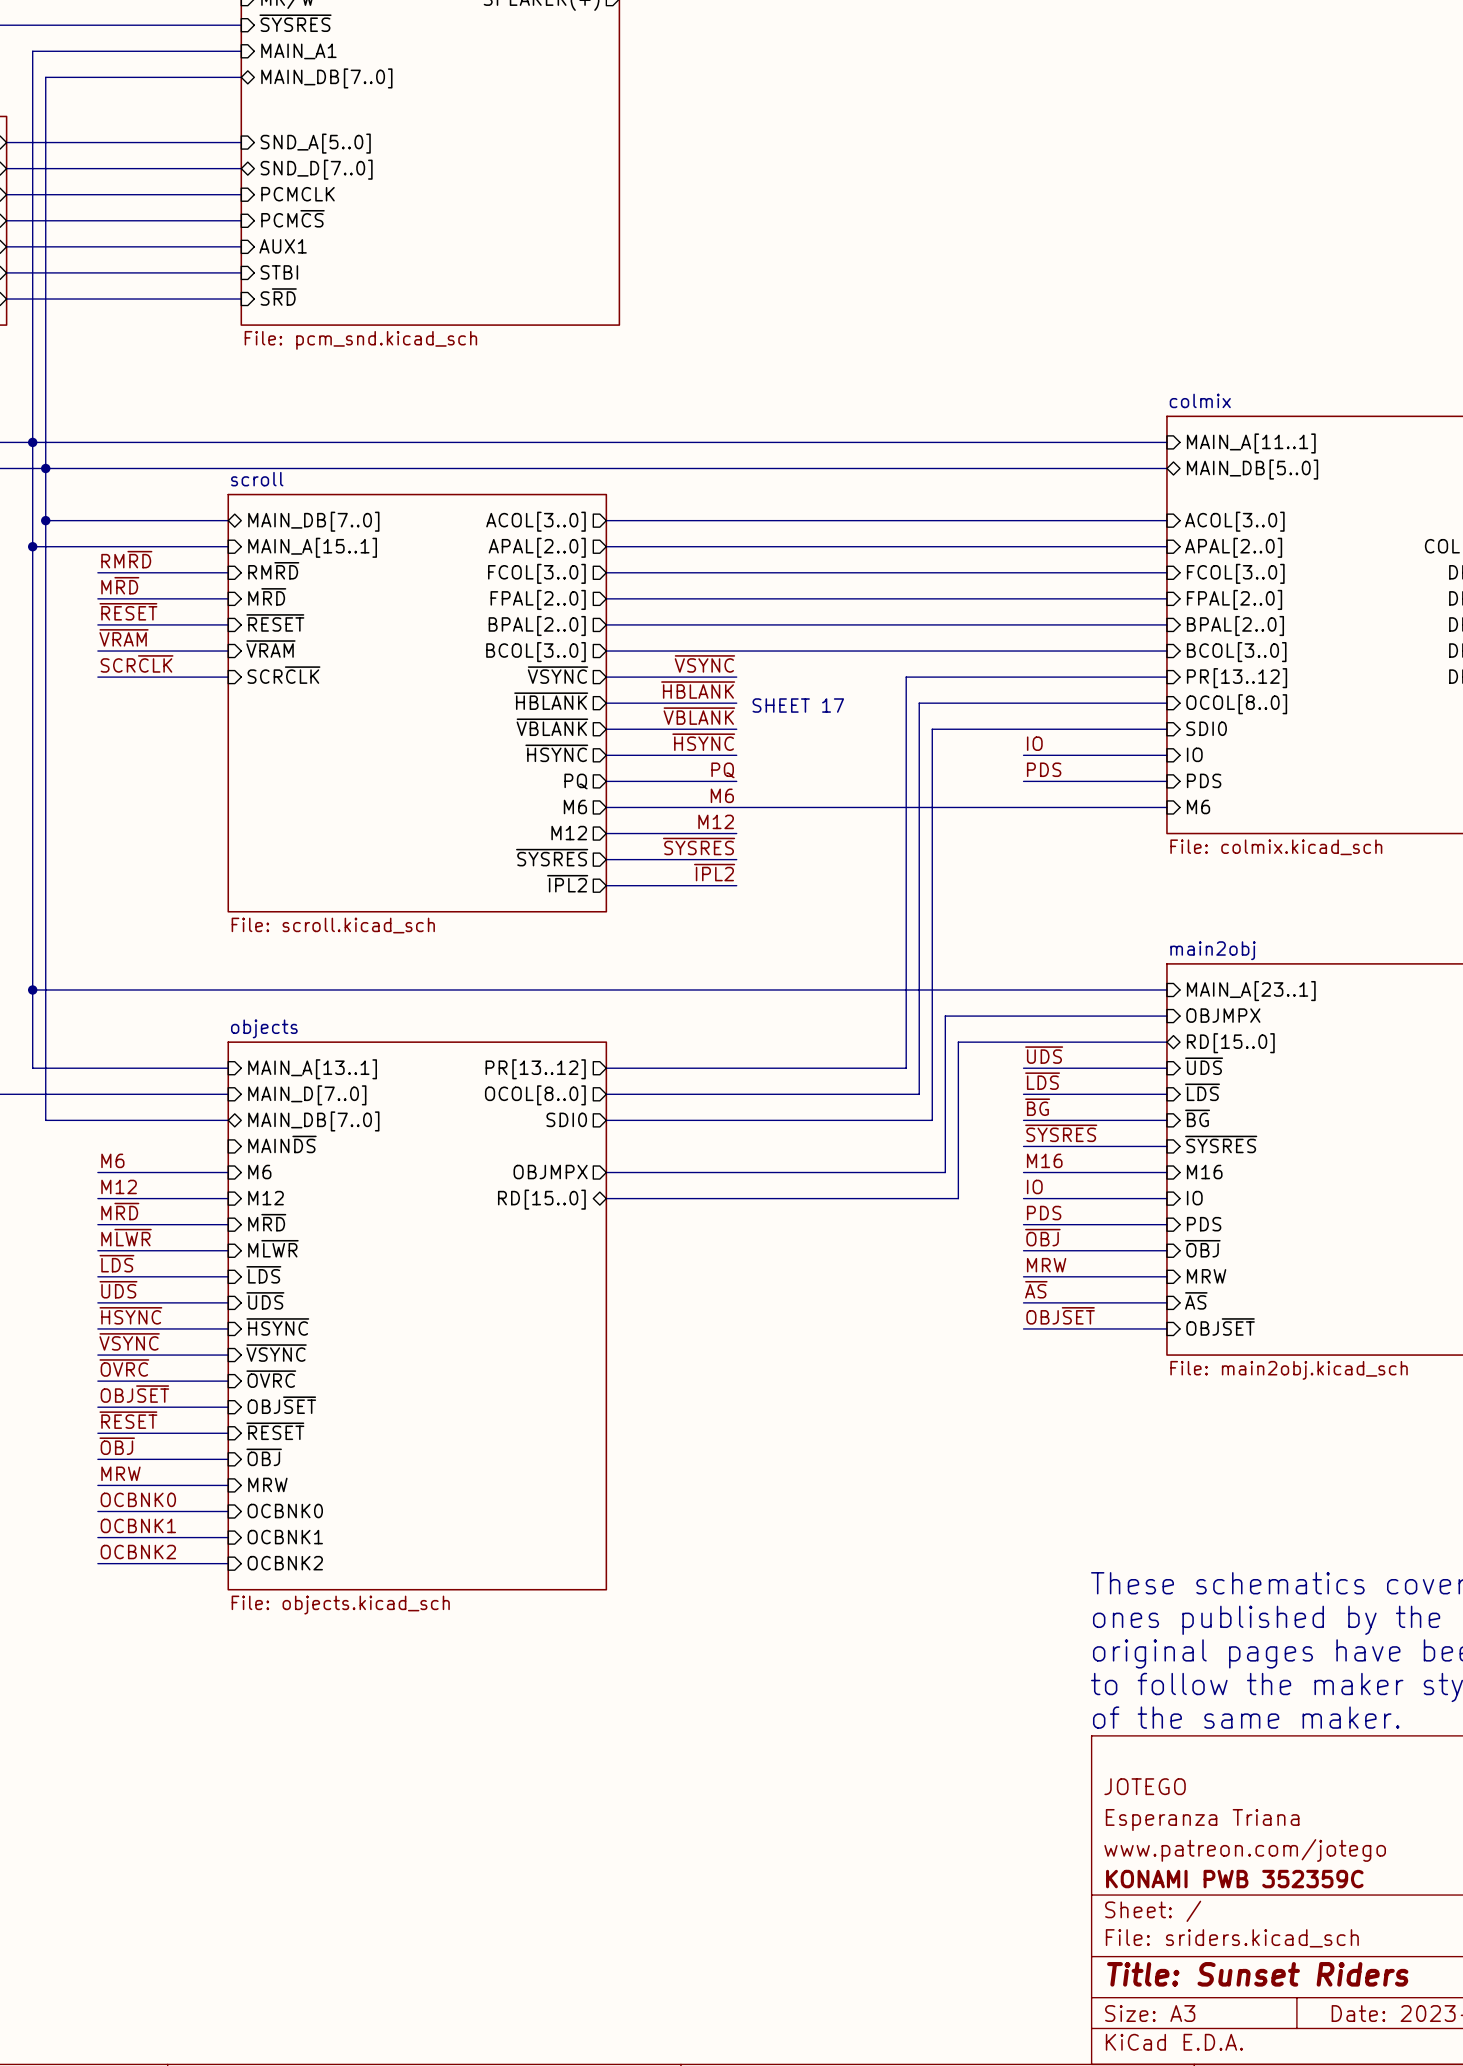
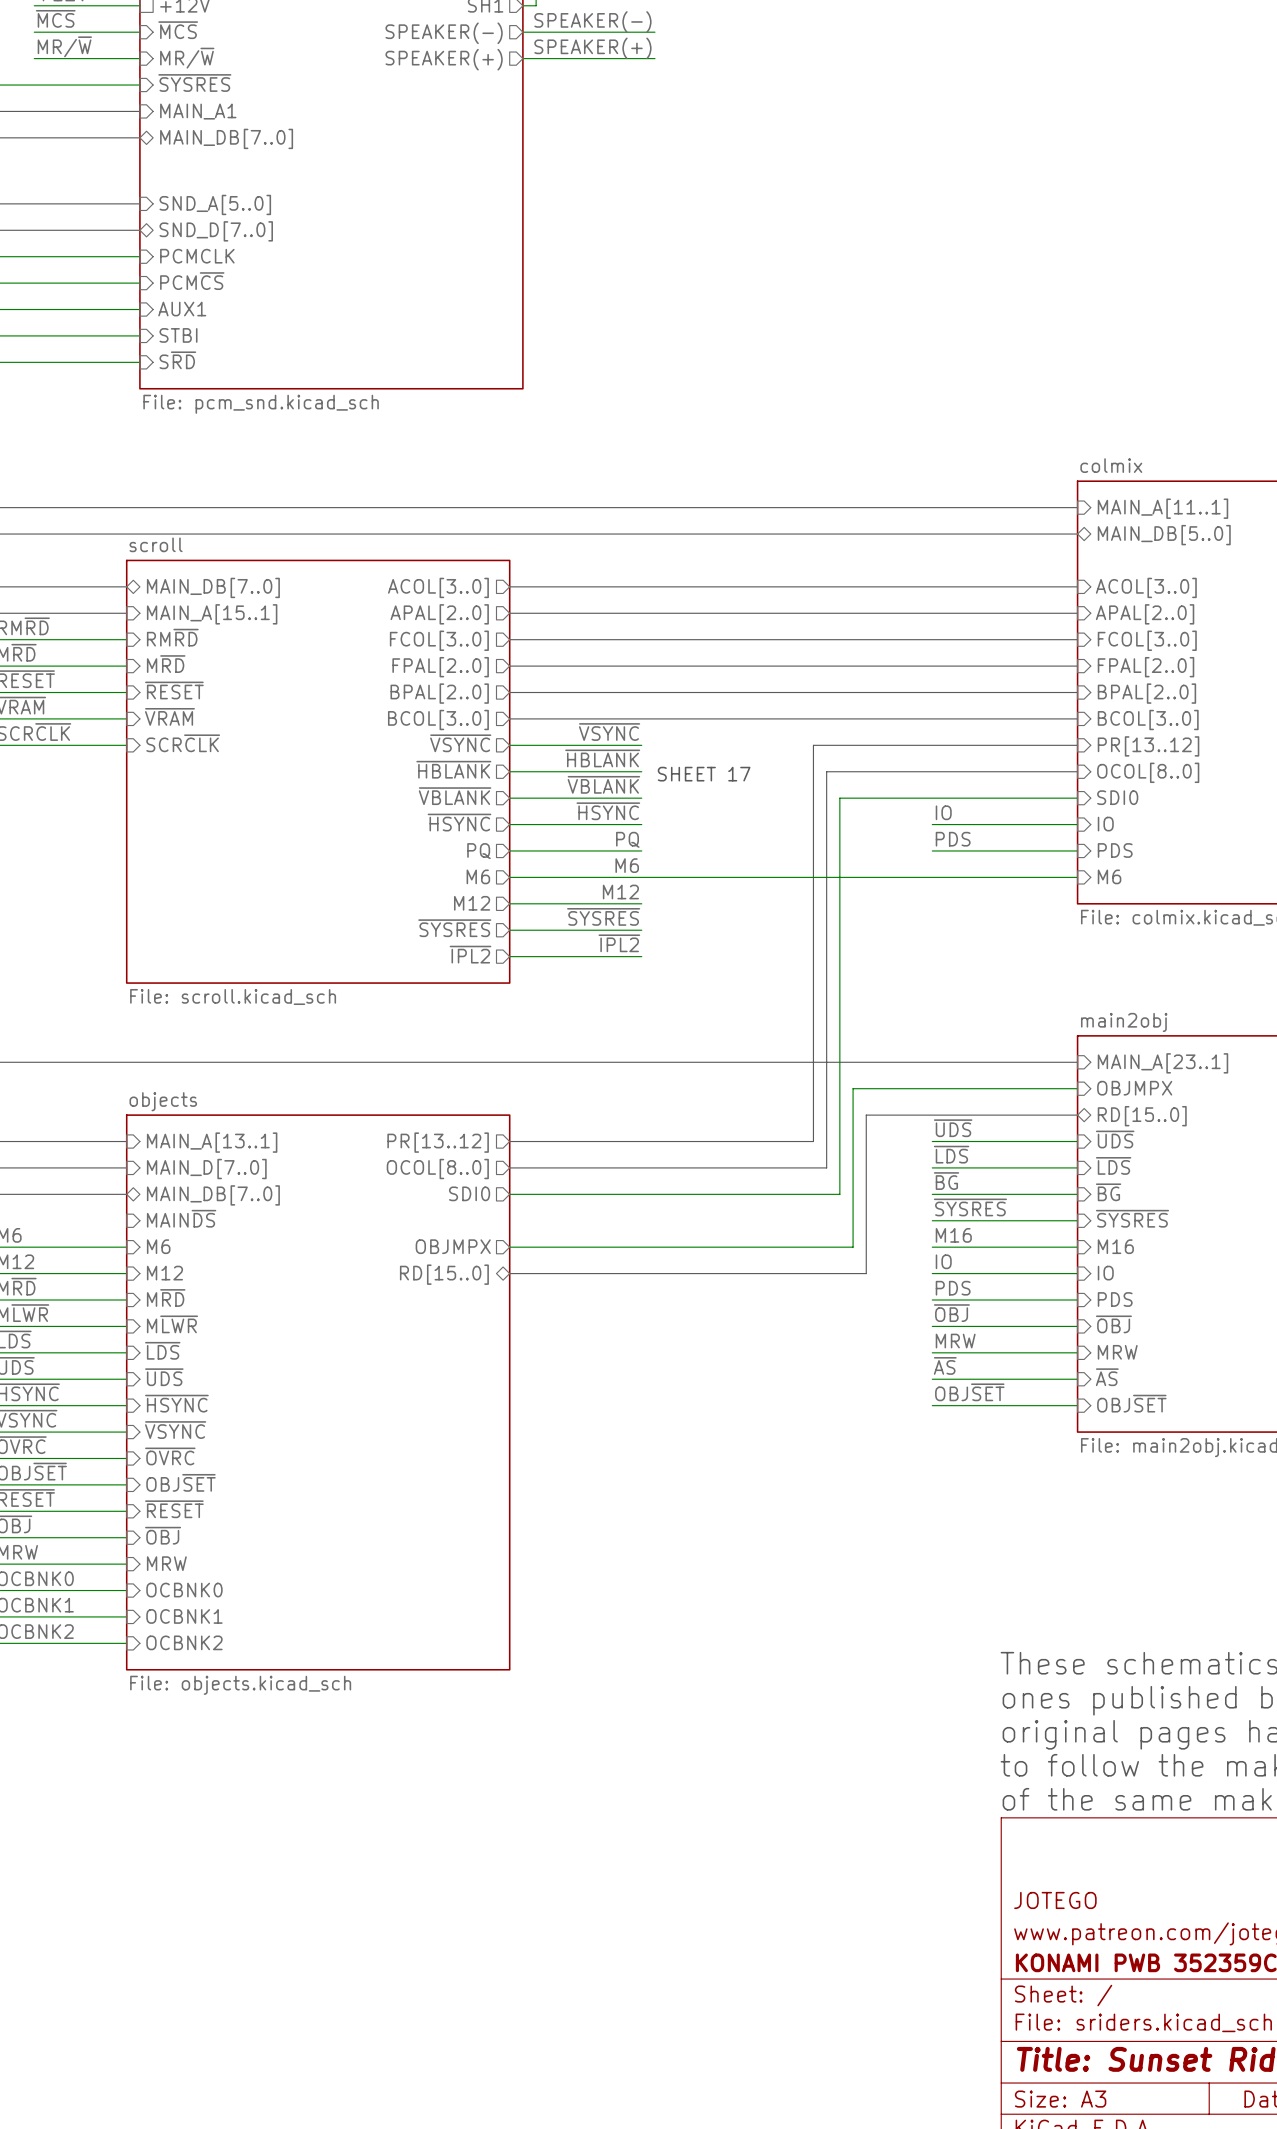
title block: JOTEGO (1145, 1786) -> none
title block: Esperanza Triana (1202, 1820) -> JOTEGO (1055, 1900)

